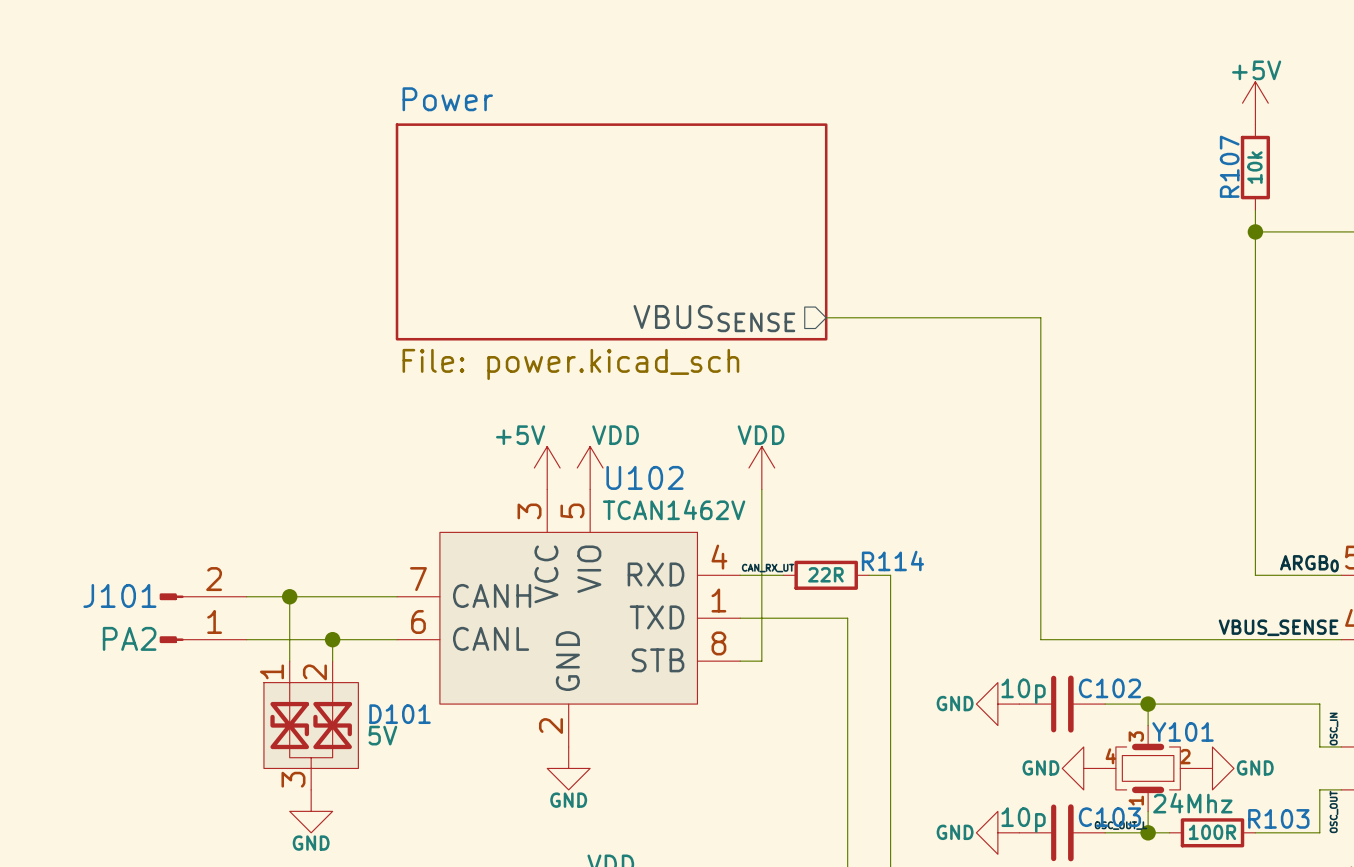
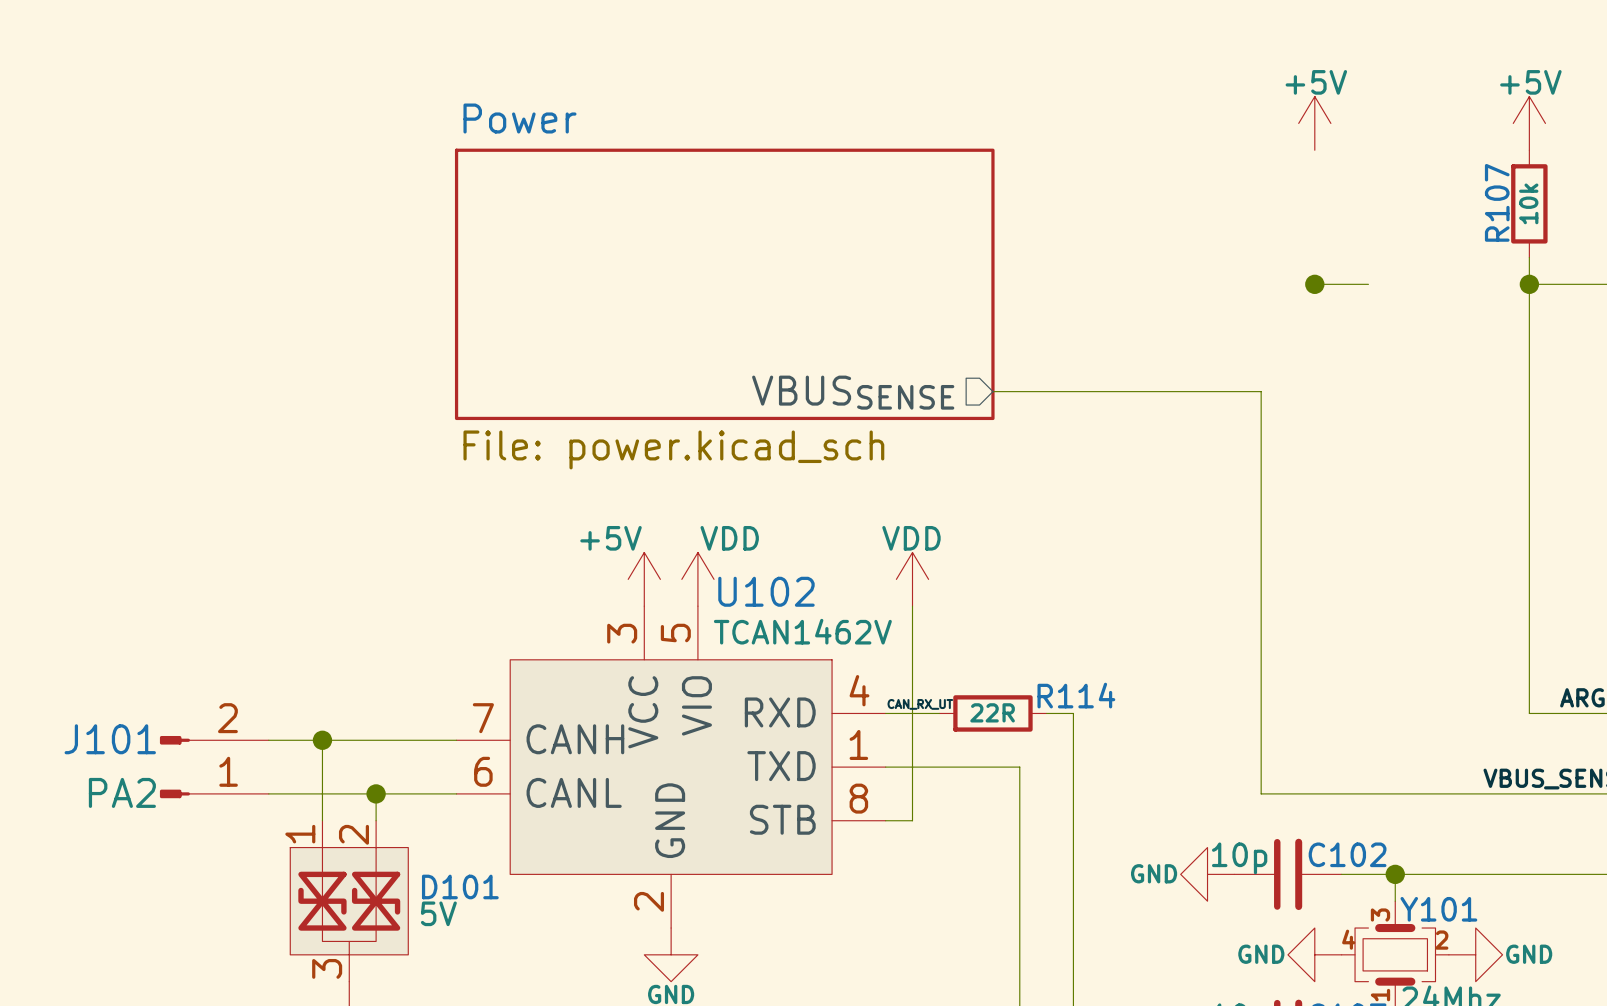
power symbol: none -> +5V (1314, 123)
wire: none -> (1314, 284) (1368, 284)
junction: none -> (1314, 284)

